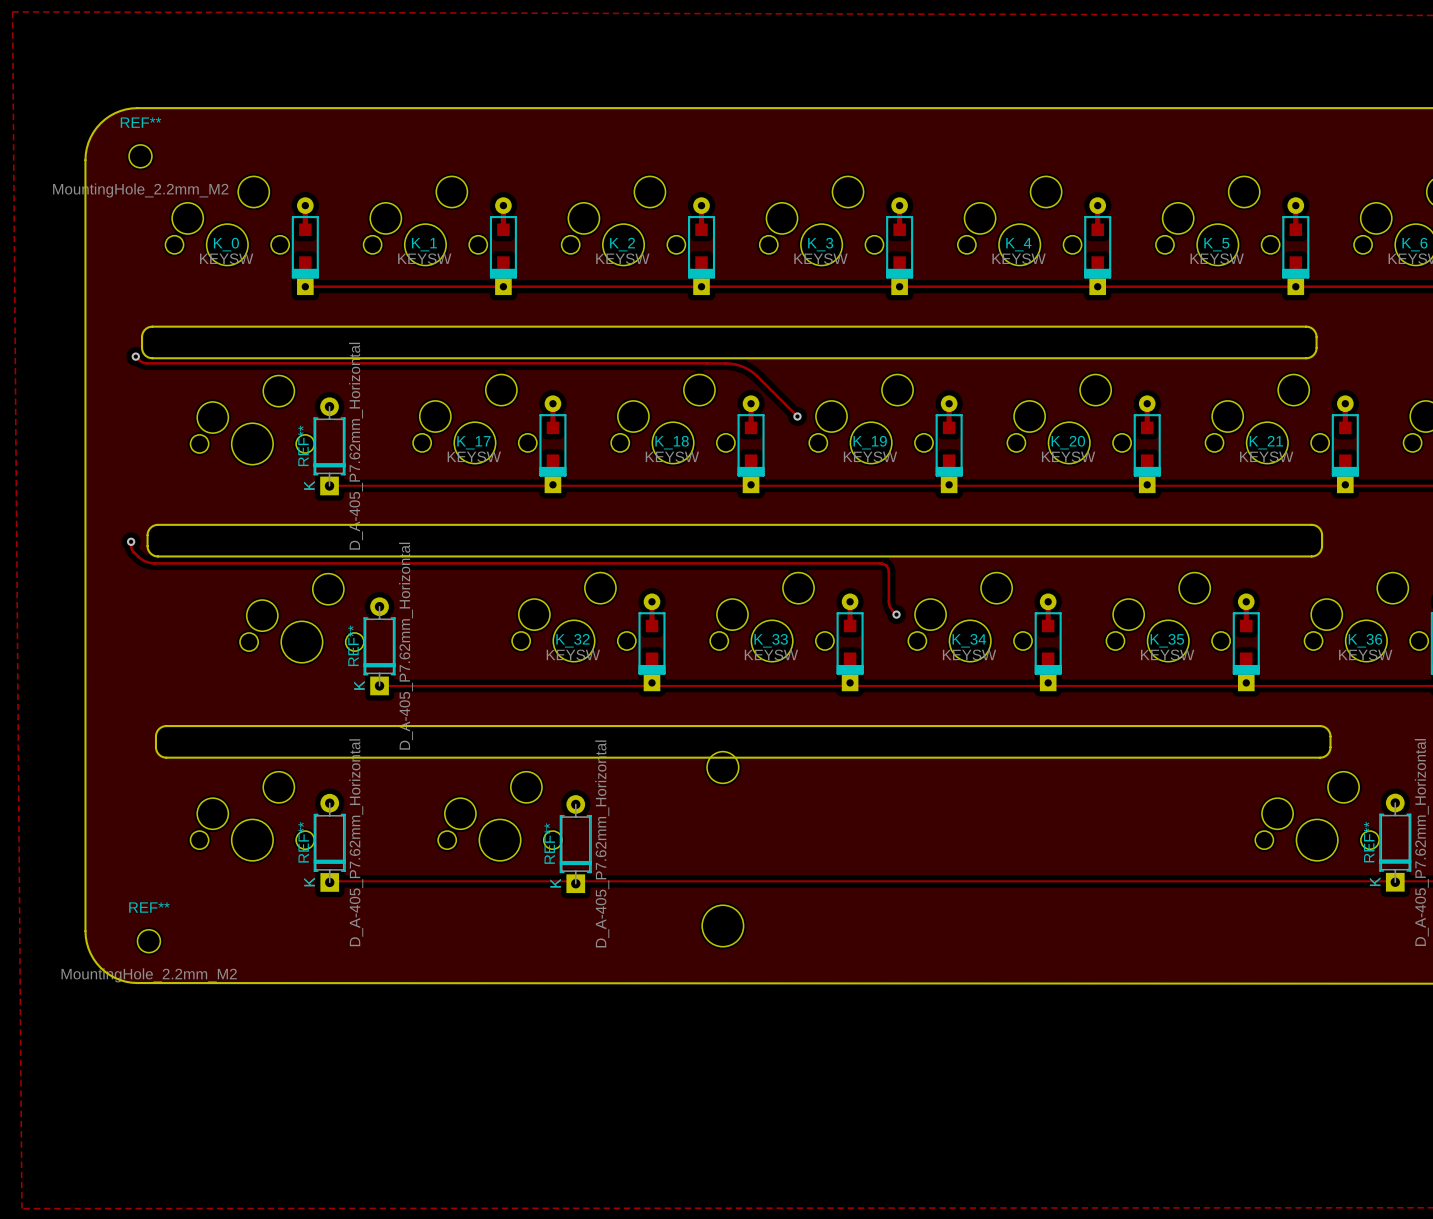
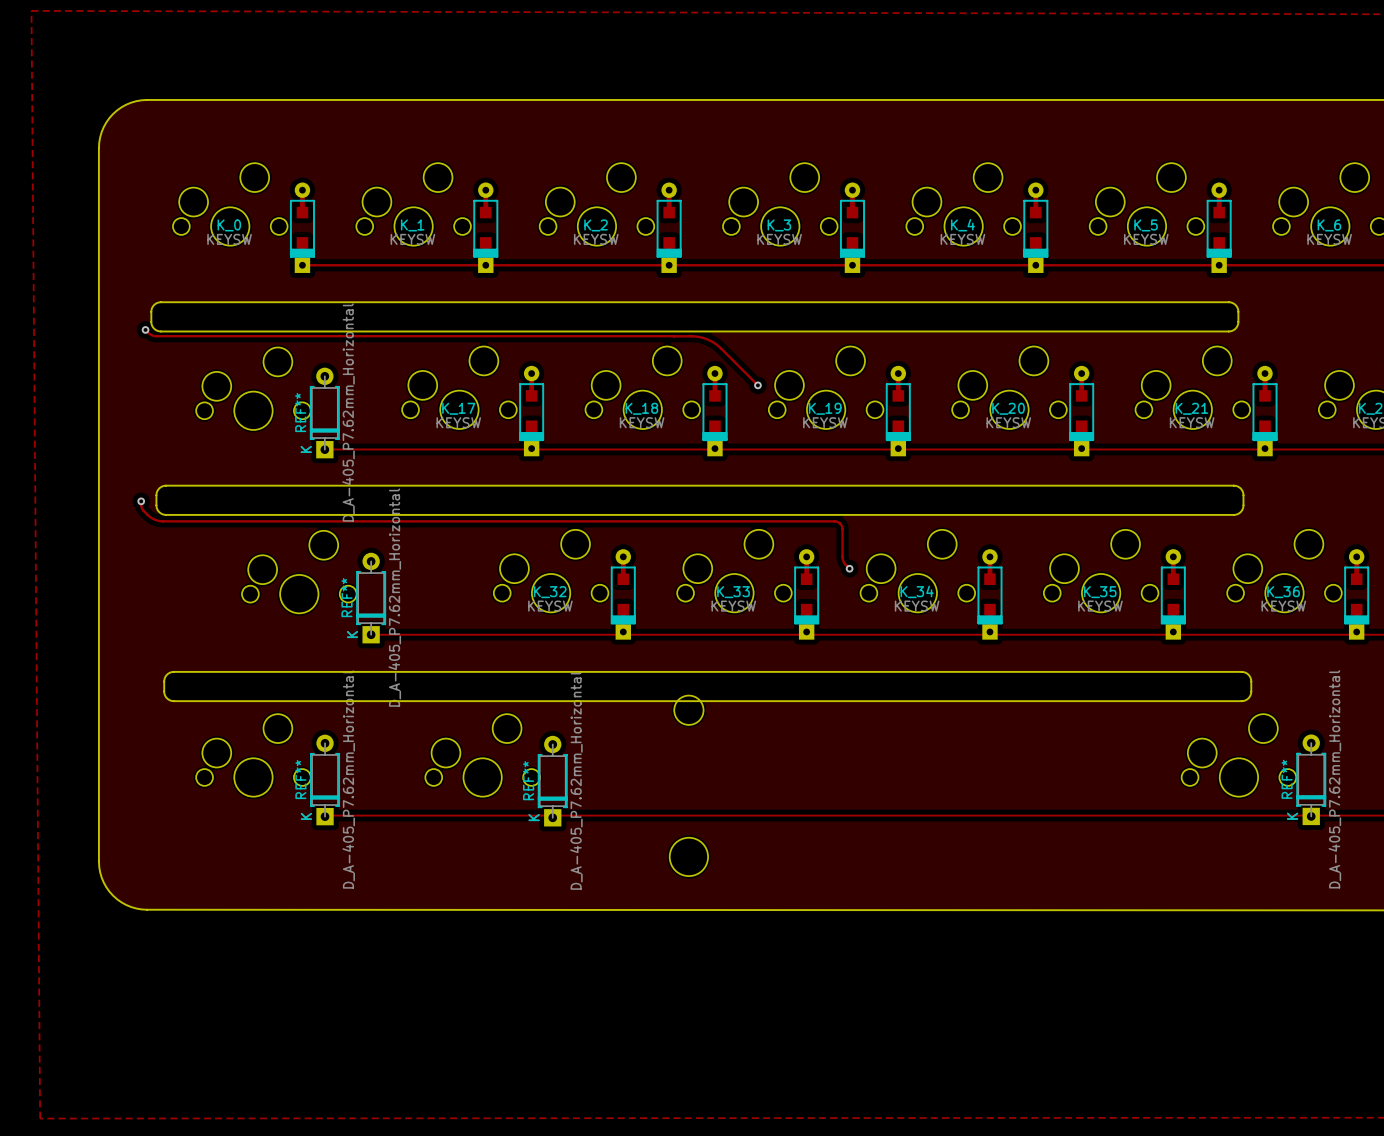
REF**: MountingHole_2.2mm_M2 (140, 156) -> none
REF**: MountingHole_2.2mm_M2 (148, 941) -> none

